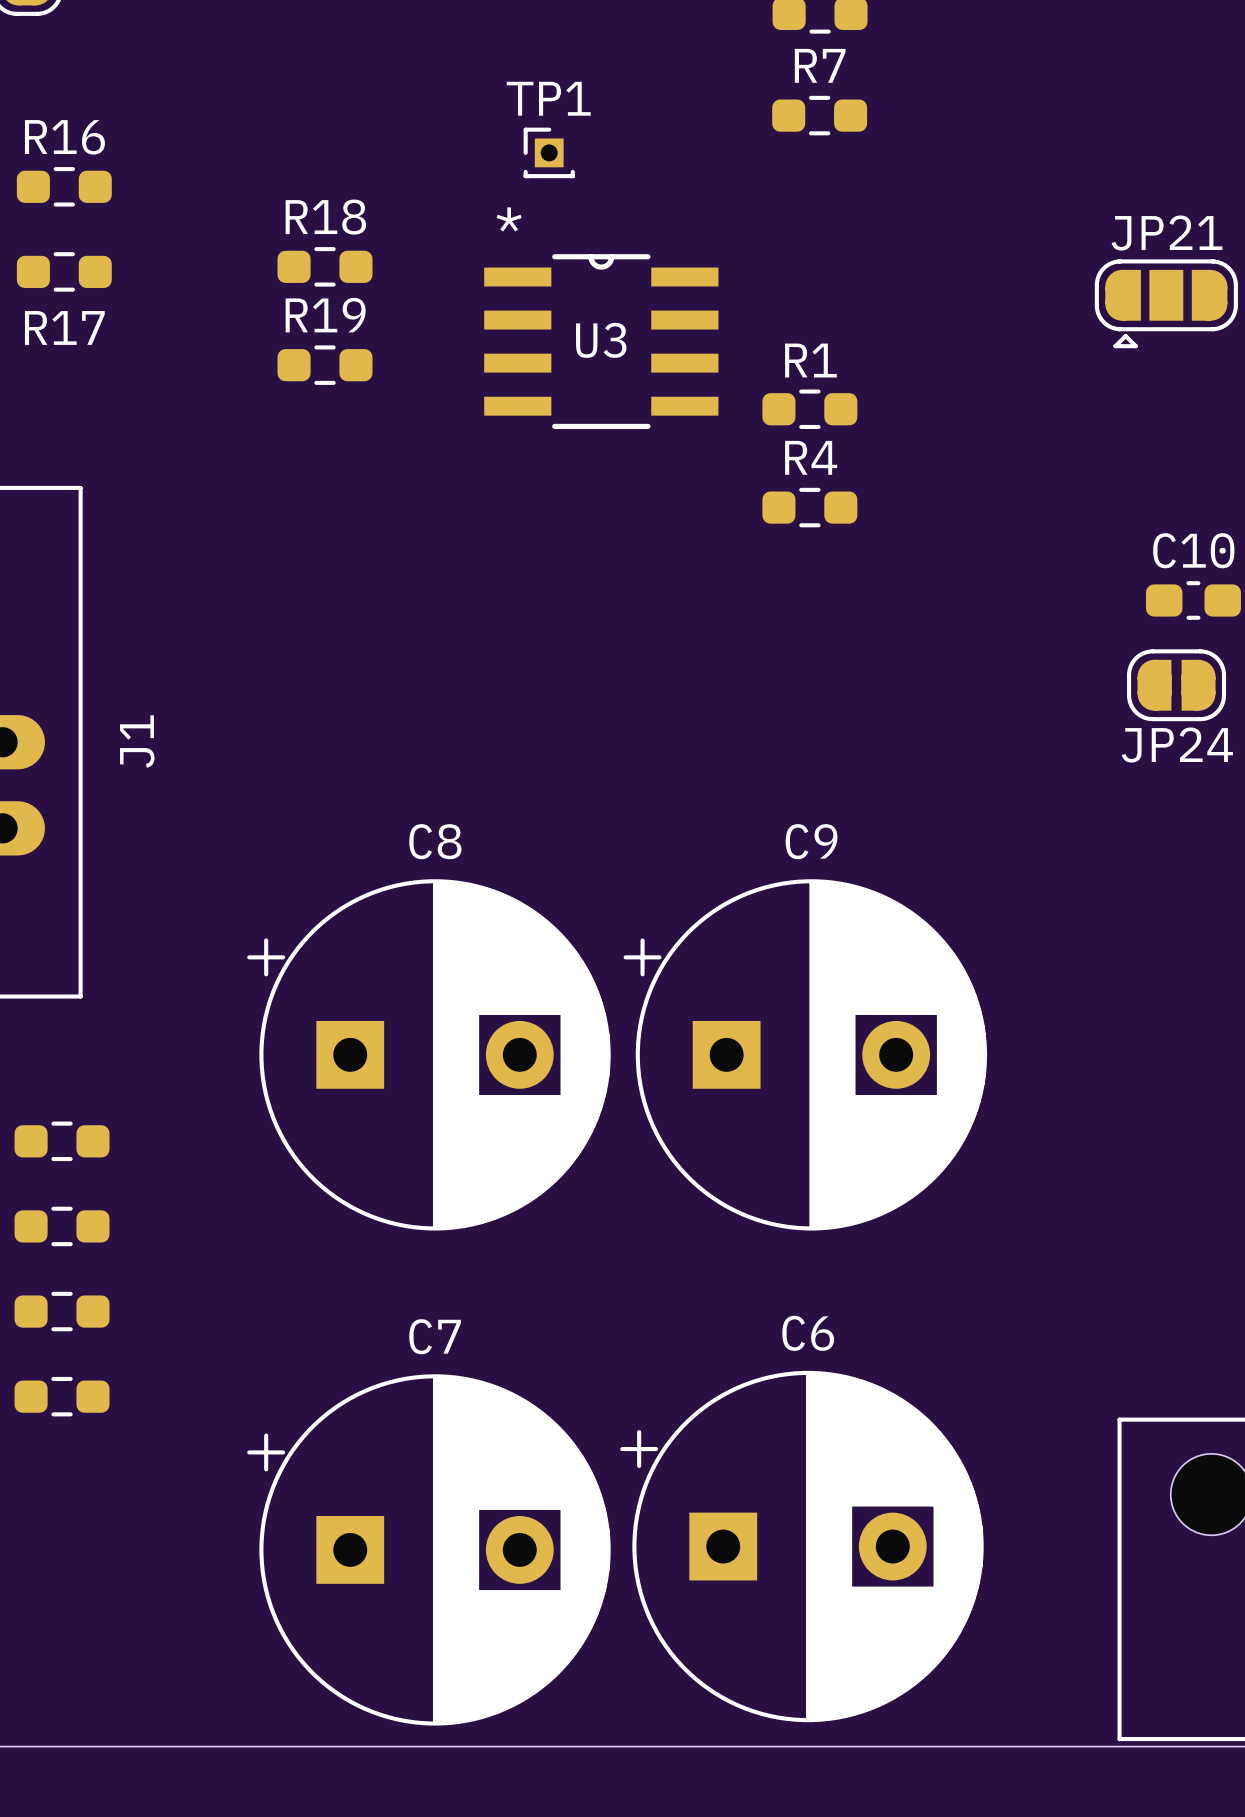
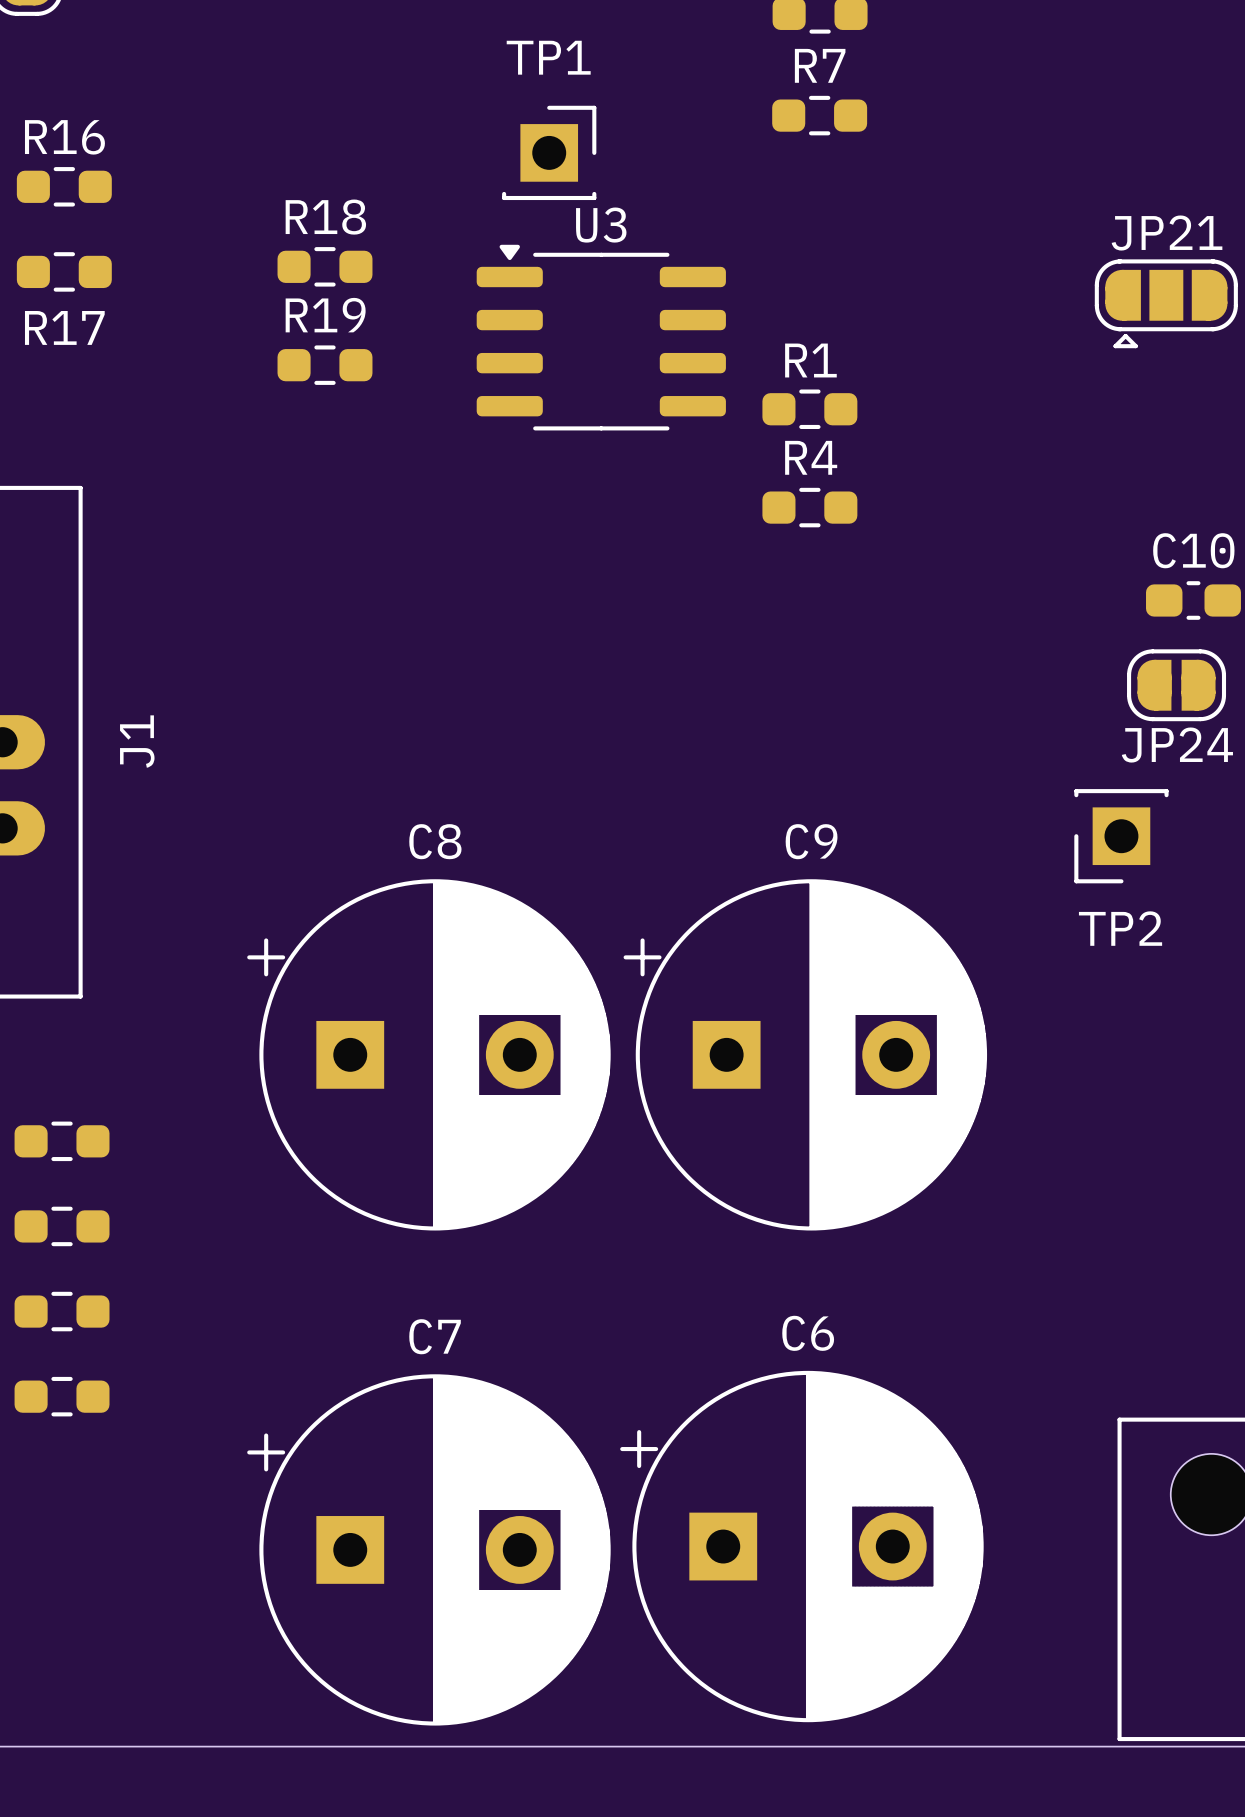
TP1 footprint: [523, 127, 575, 179] -> [502, 105, 597, 201]
U3 footprint: [484, 254, 719, 430] -> [476, 244, 726, 431]
U3 name position: U3 (601, 340) -> U3 (601, 225)
TP2: none -> (1121, 836)

